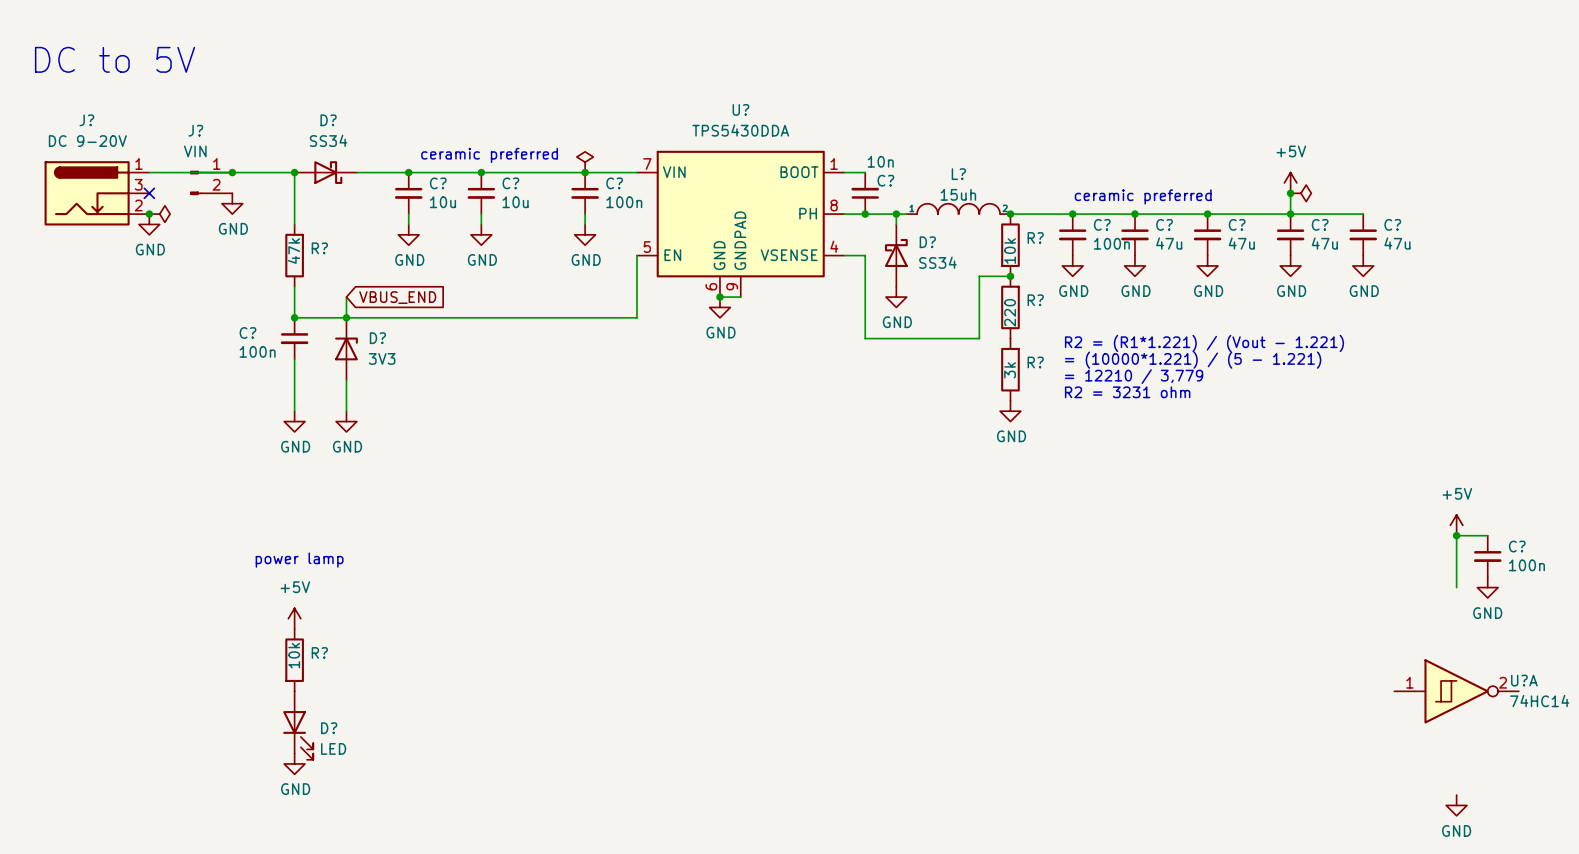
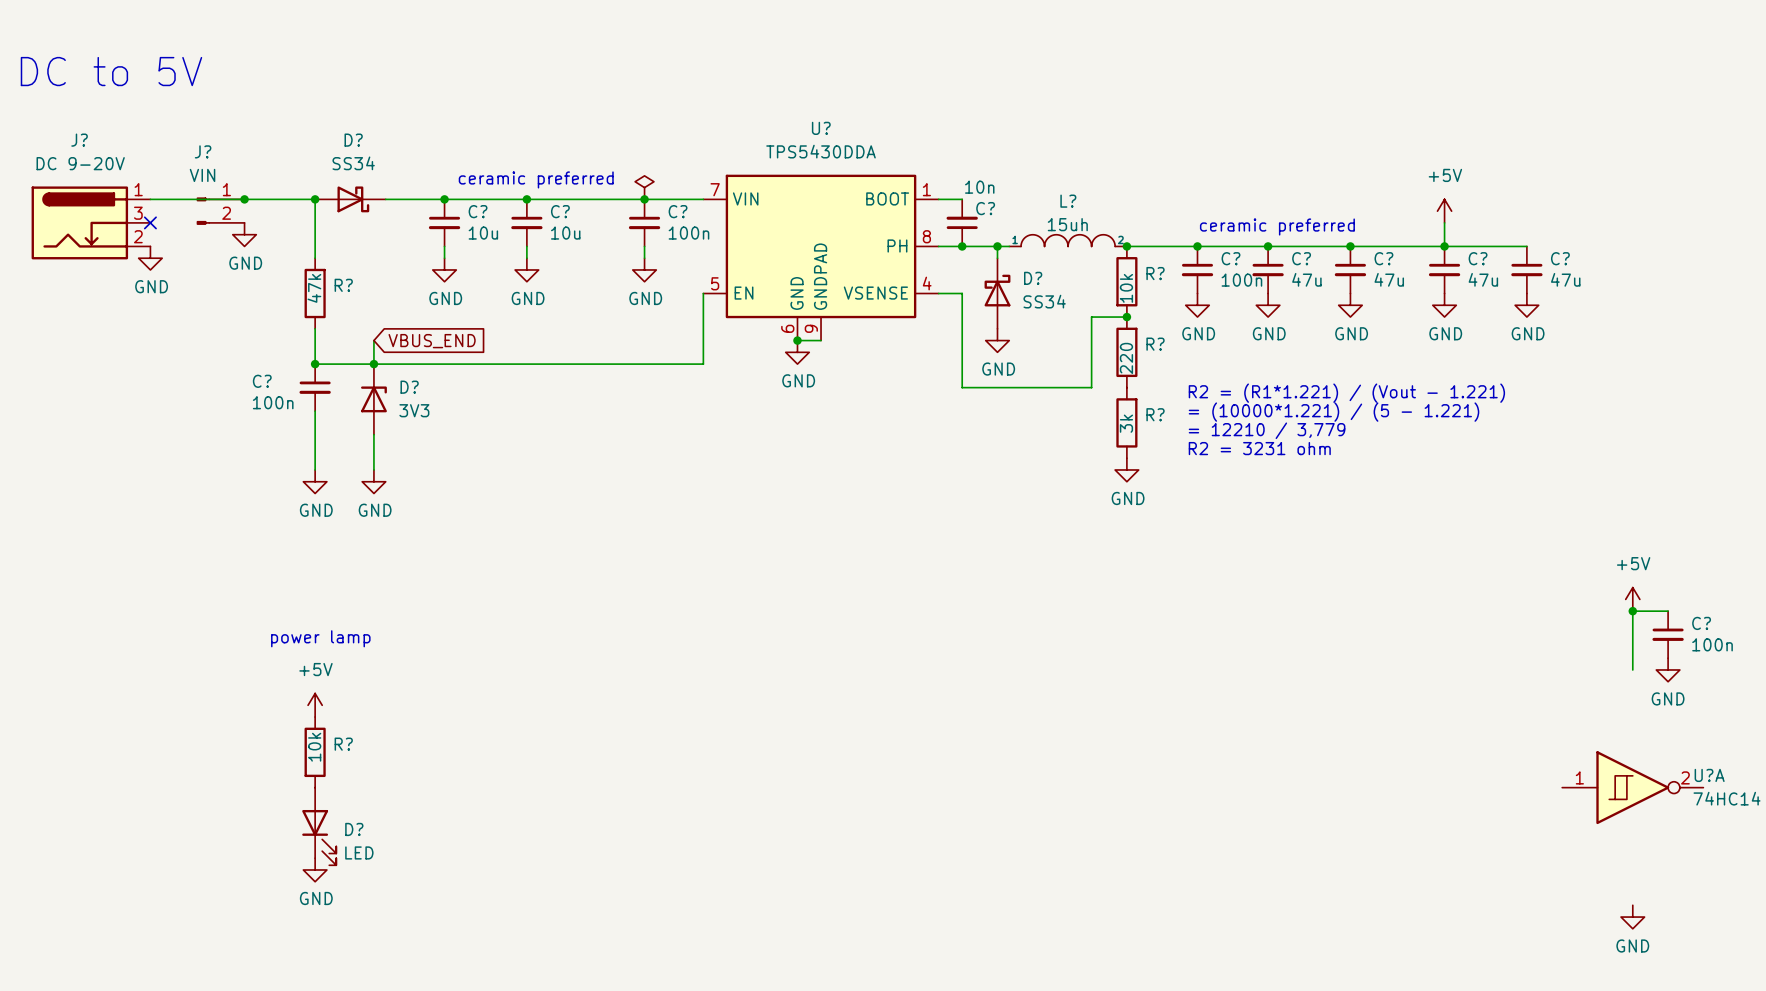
junction: (1290, 193) -> none
power symbol: (1300, 193) -> none
junction: (149, 214) -> none
power symbol: (159, 214) -> none

